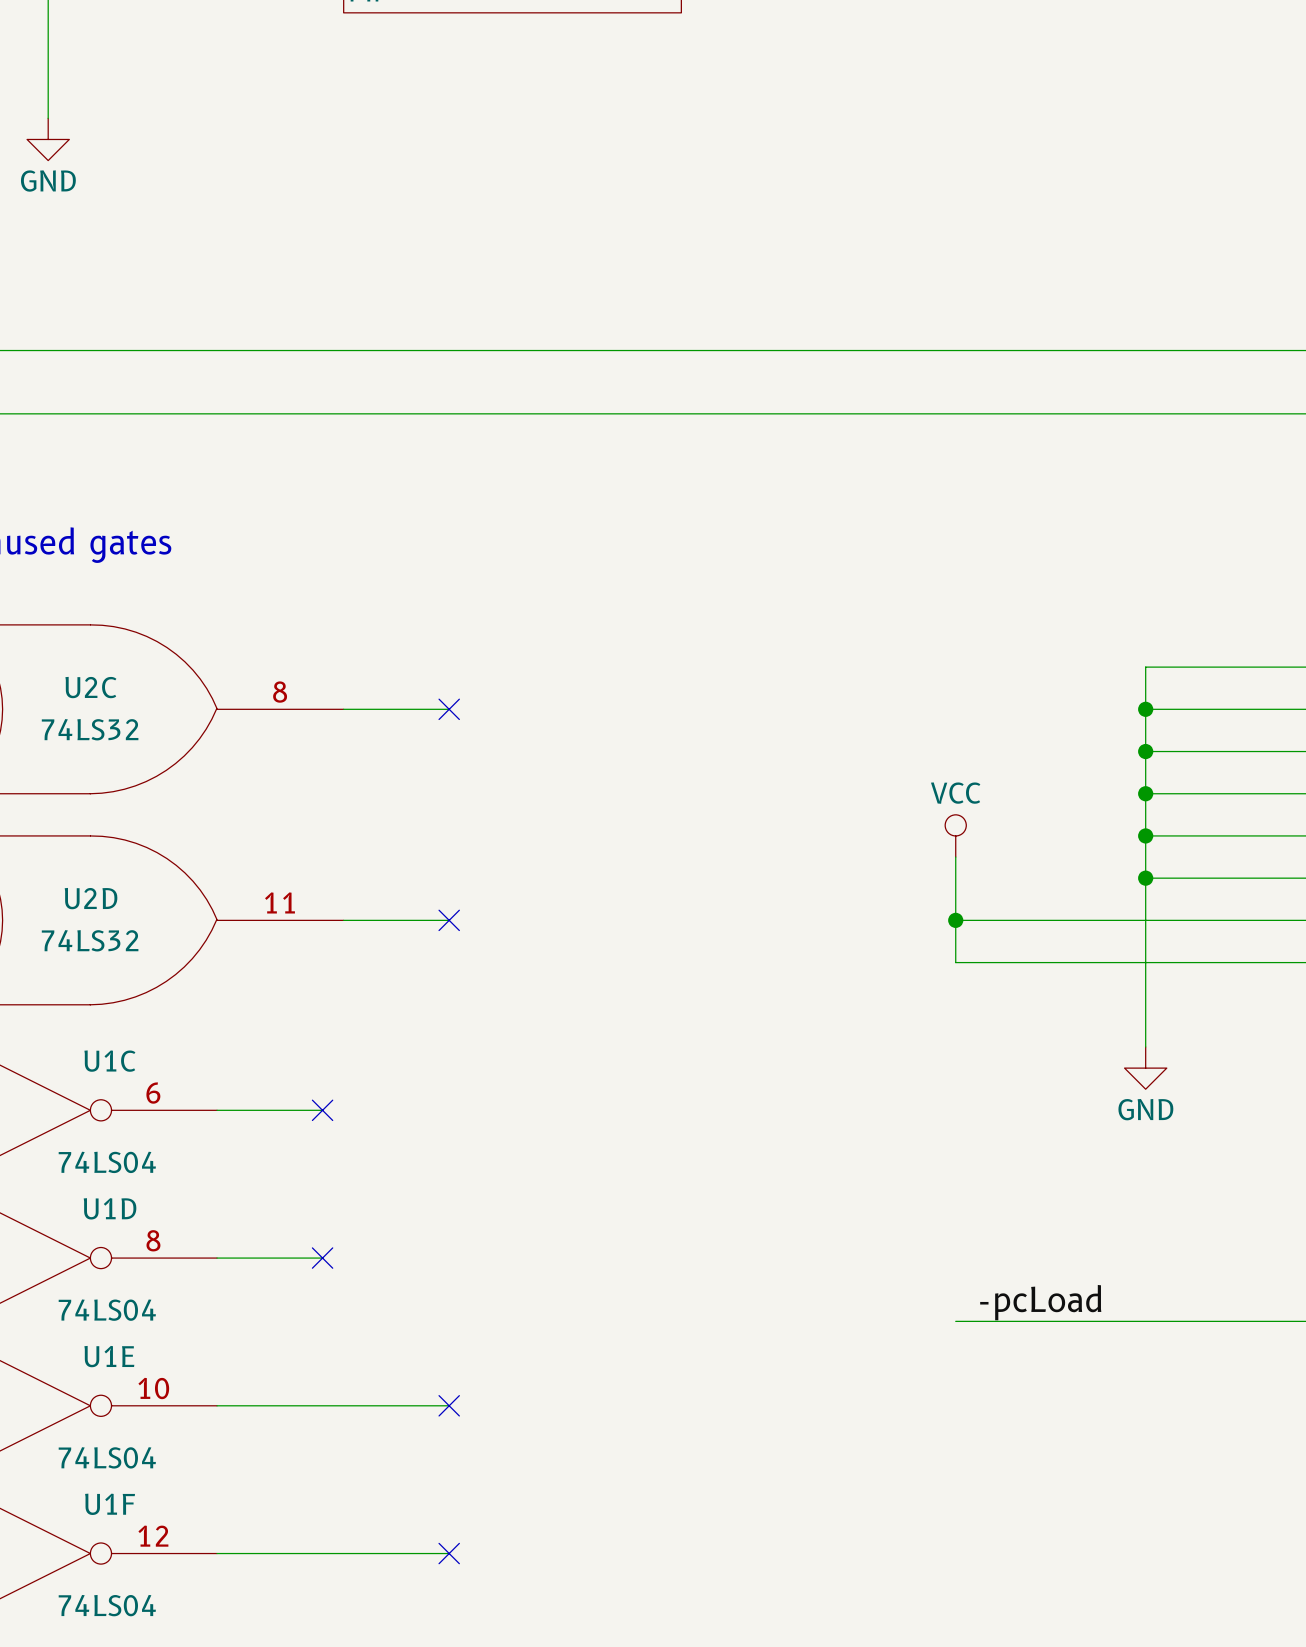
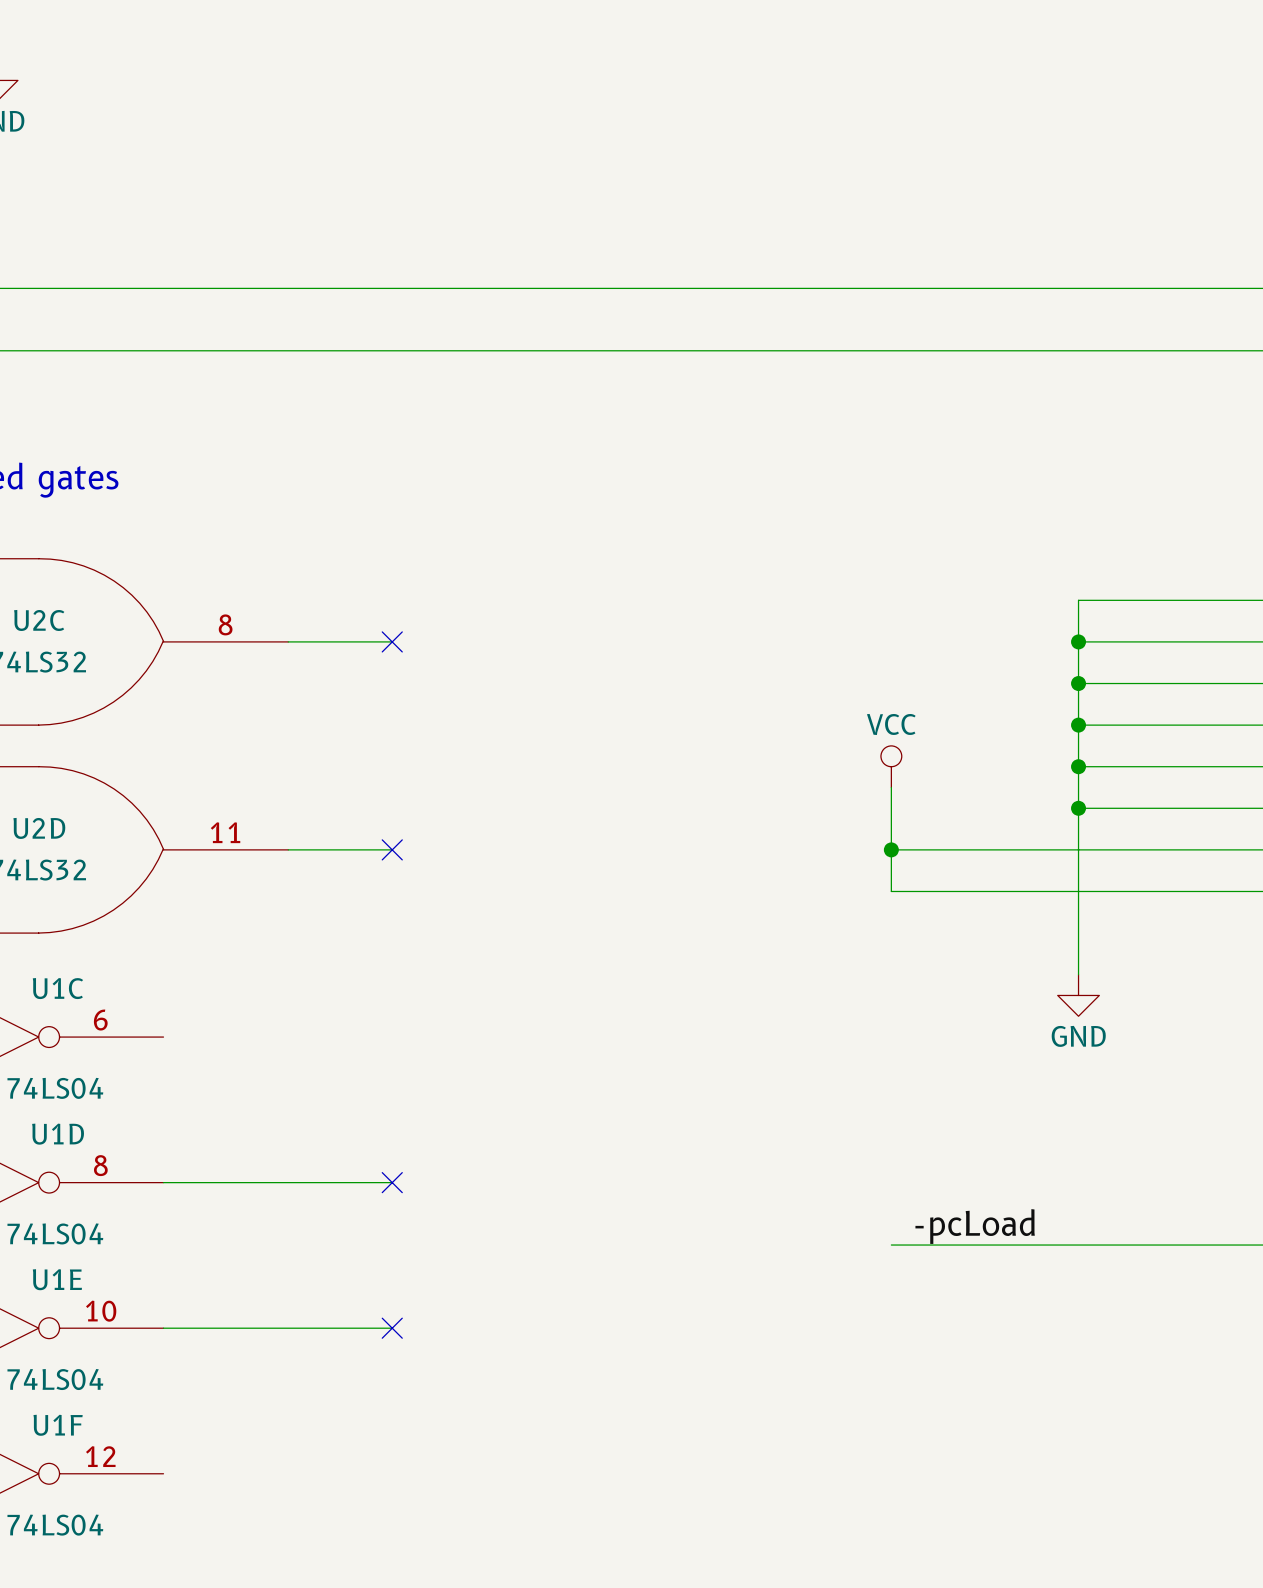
wire: (217, 1110) (322, 1110) -> none
no-connect mark: (322, 1110) -> none
wire: none -> (267, 1182) (392, 1182)
no-connect mark: (322, 1258) -> none
no-connect mark: none -> (392, 1182)
wire: (217, 1553) (449, 1553) -> none
no-connect mark: (449, 1553) -> none

